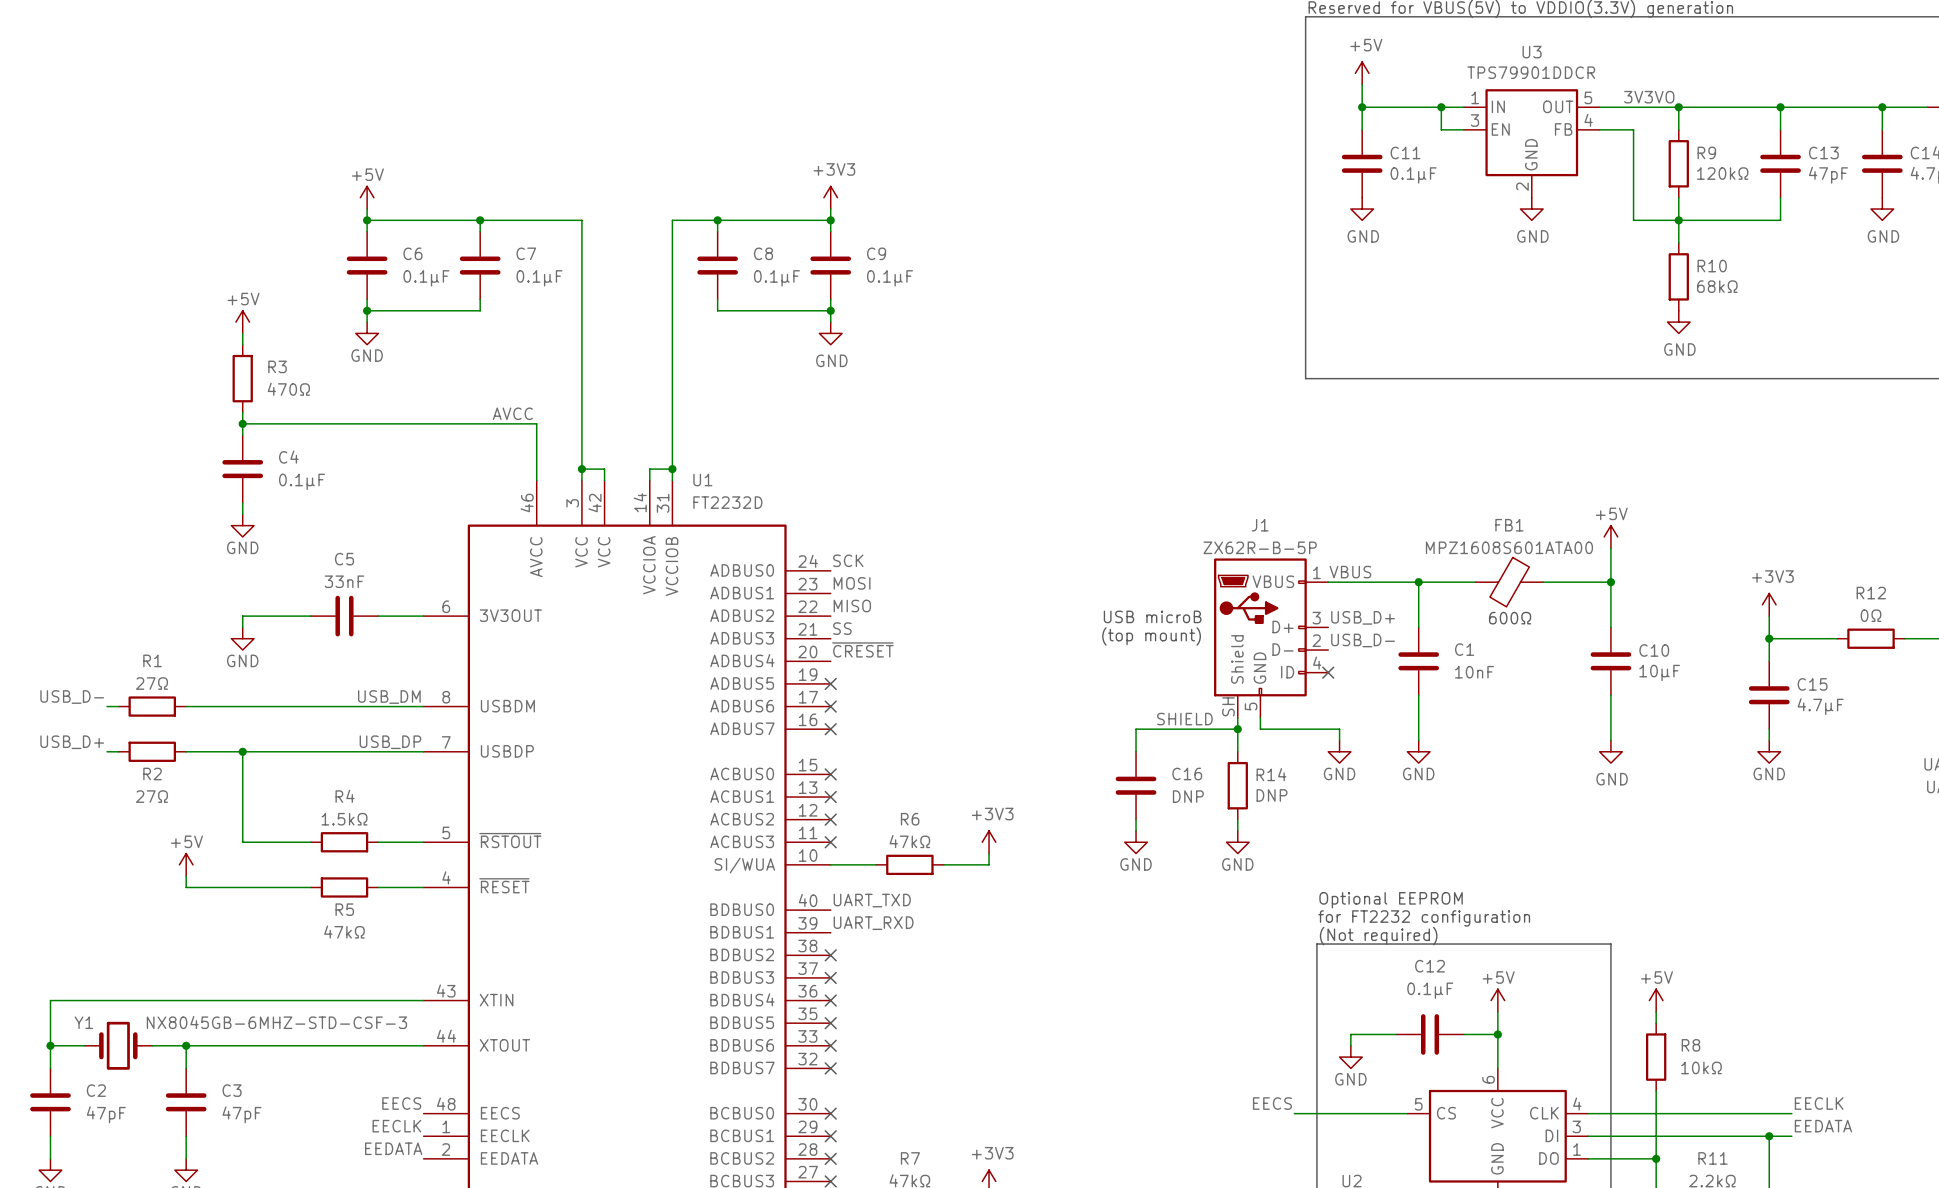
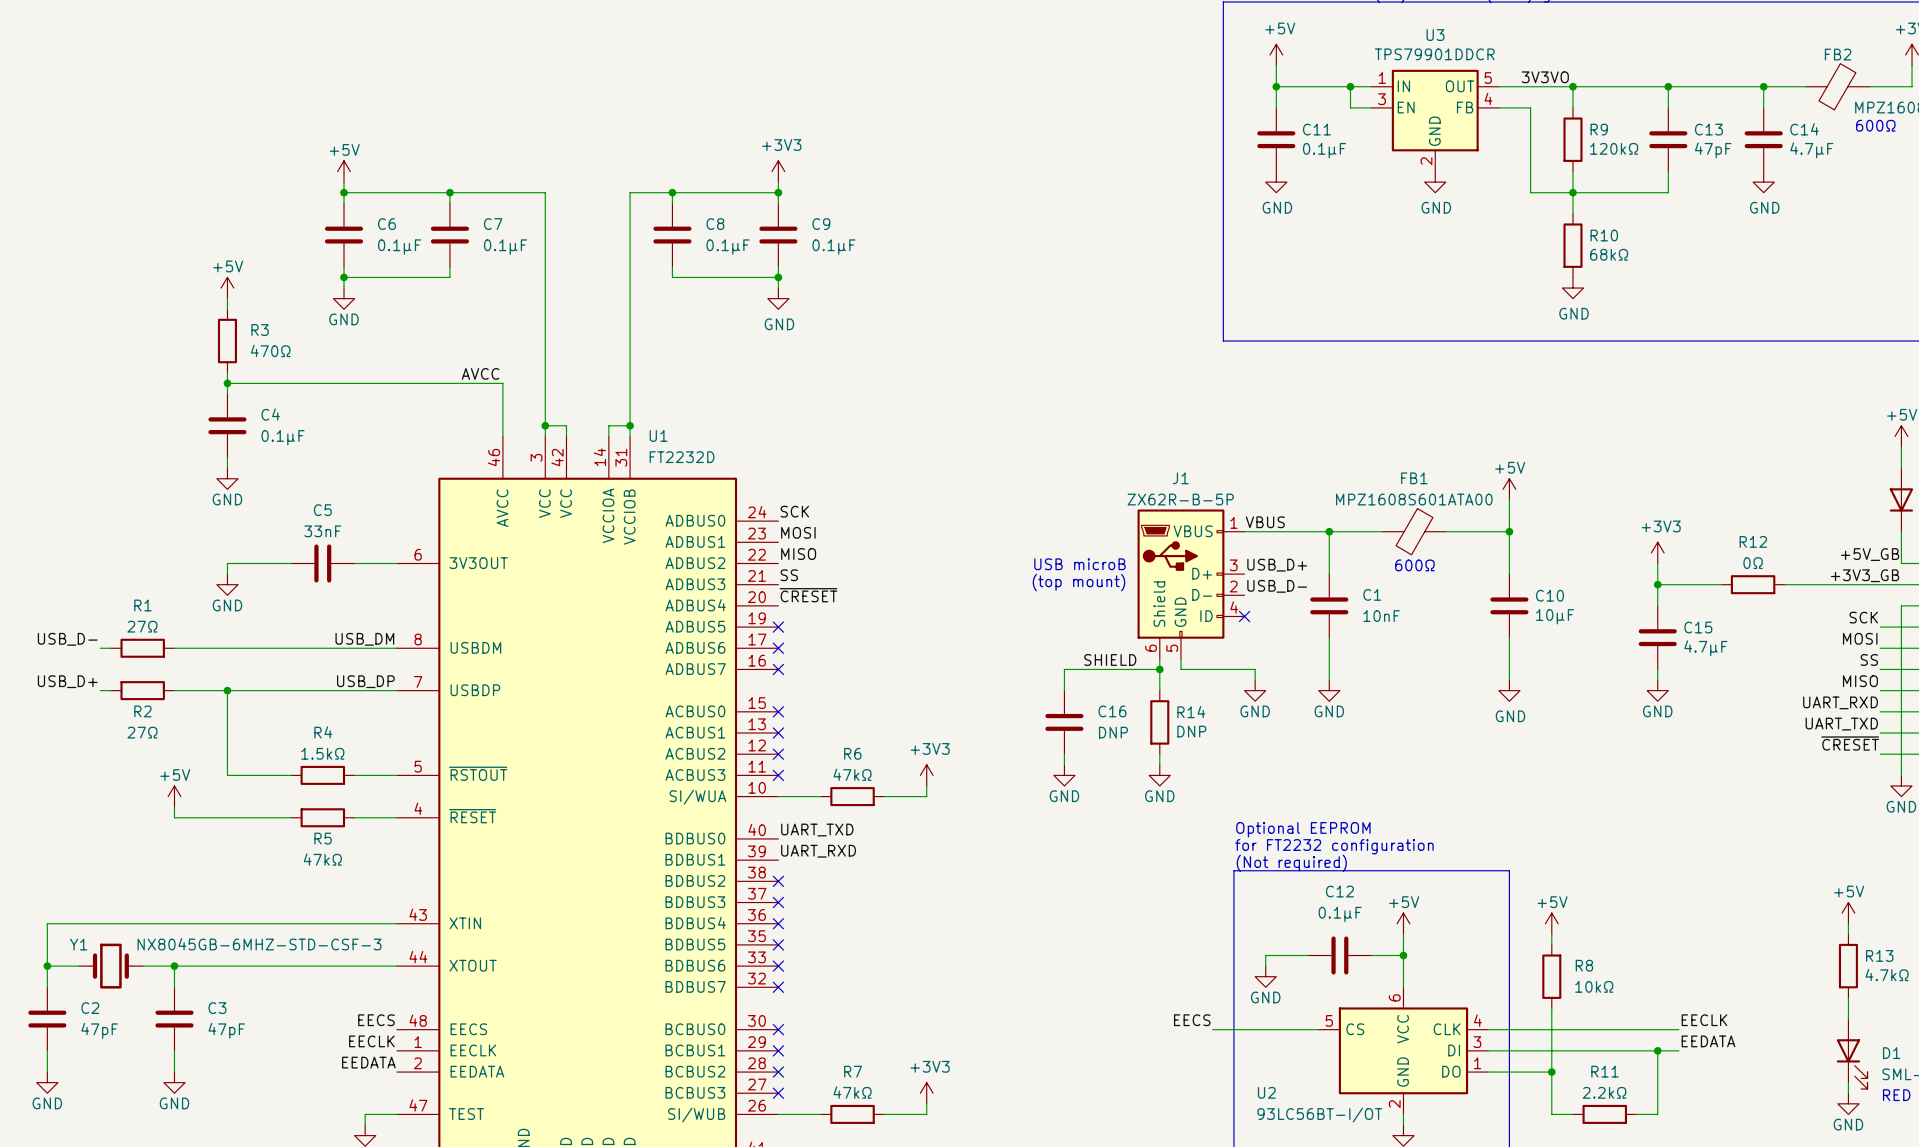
J1 pin number: SH (1228, 706) -> 6 (1151, 648)

